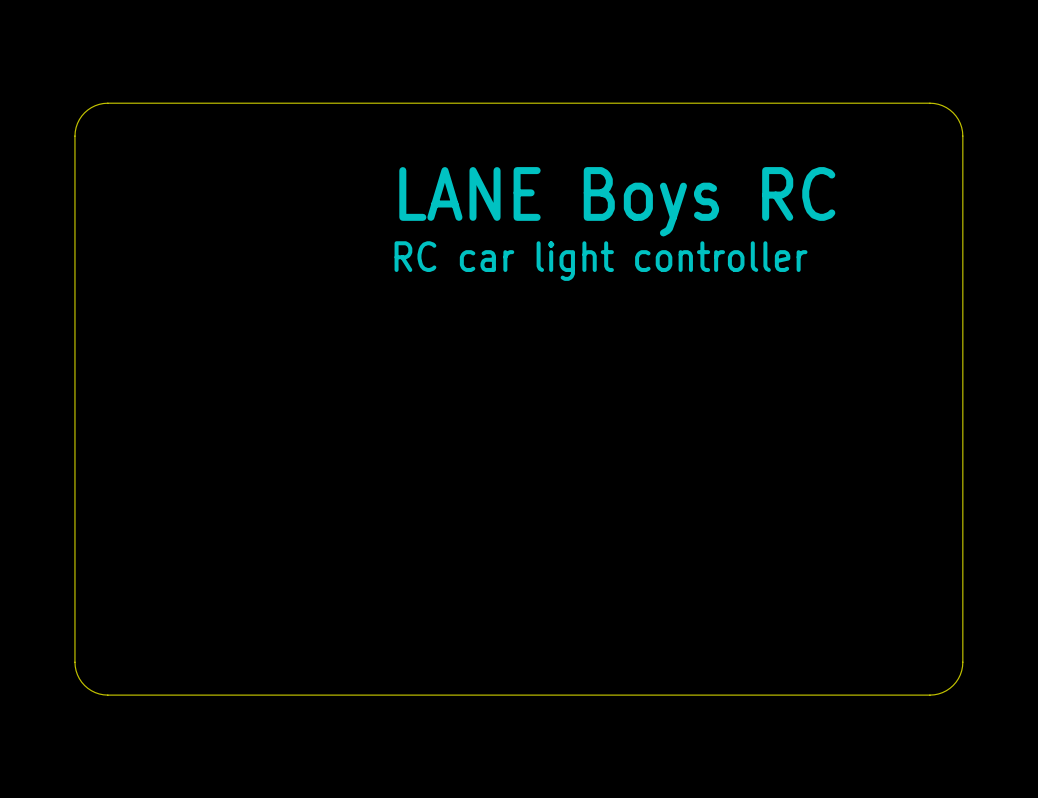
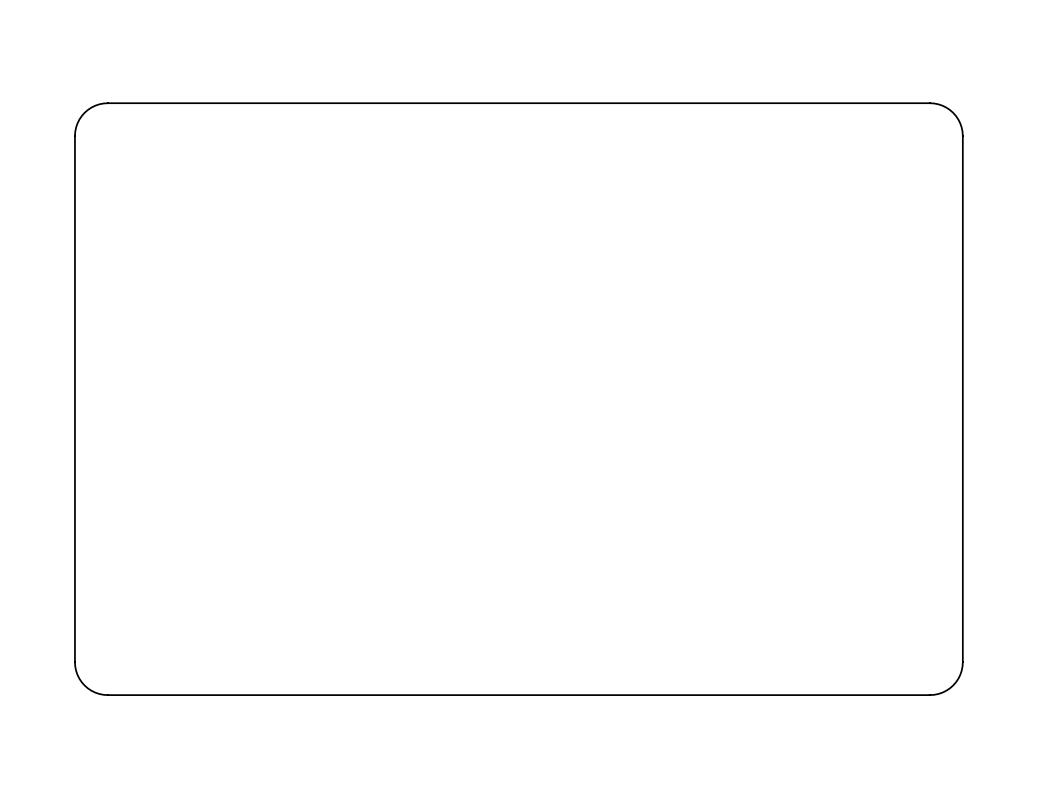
text: LANE Boys RC (617, 201) -> none
text: RC car light controller (601, 261) -> none

